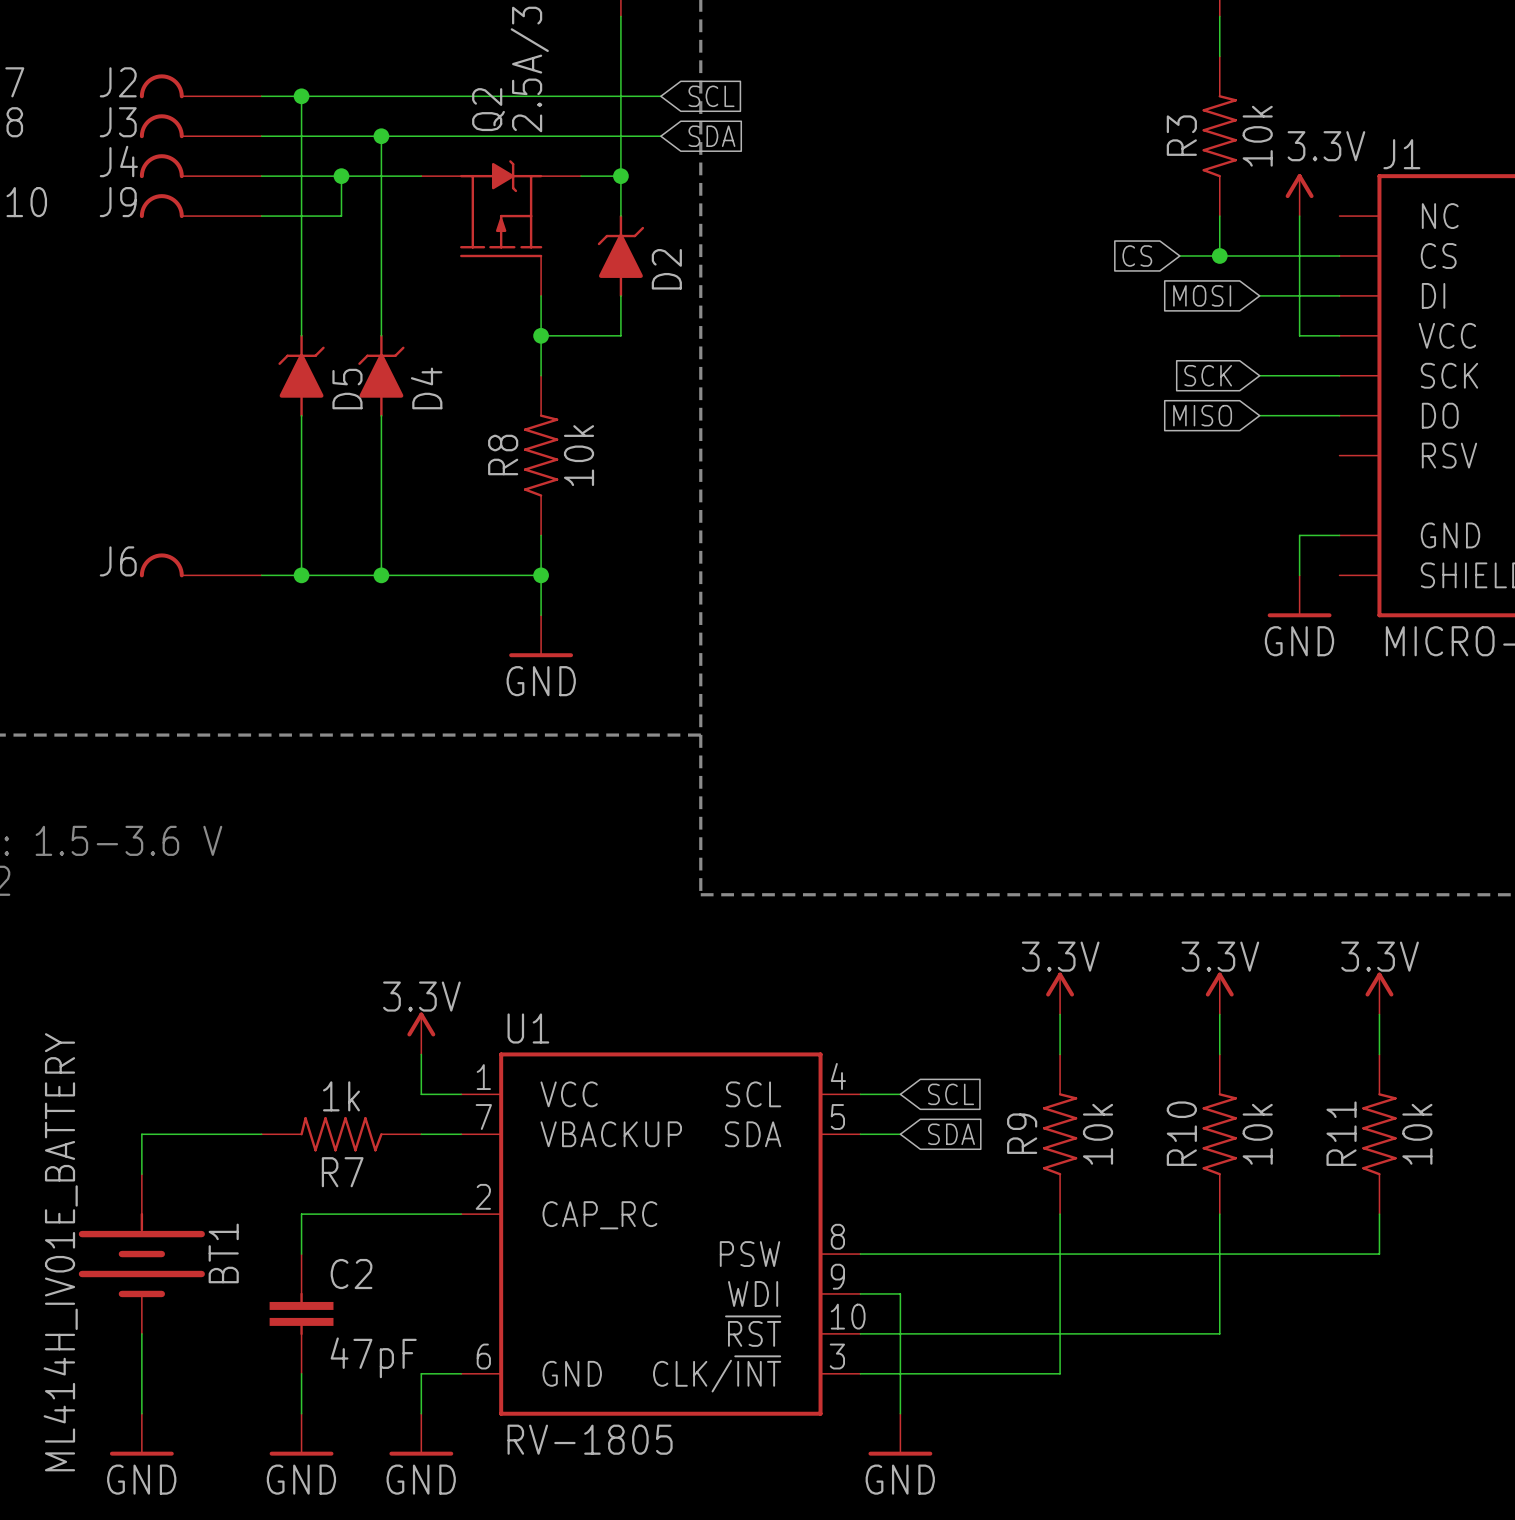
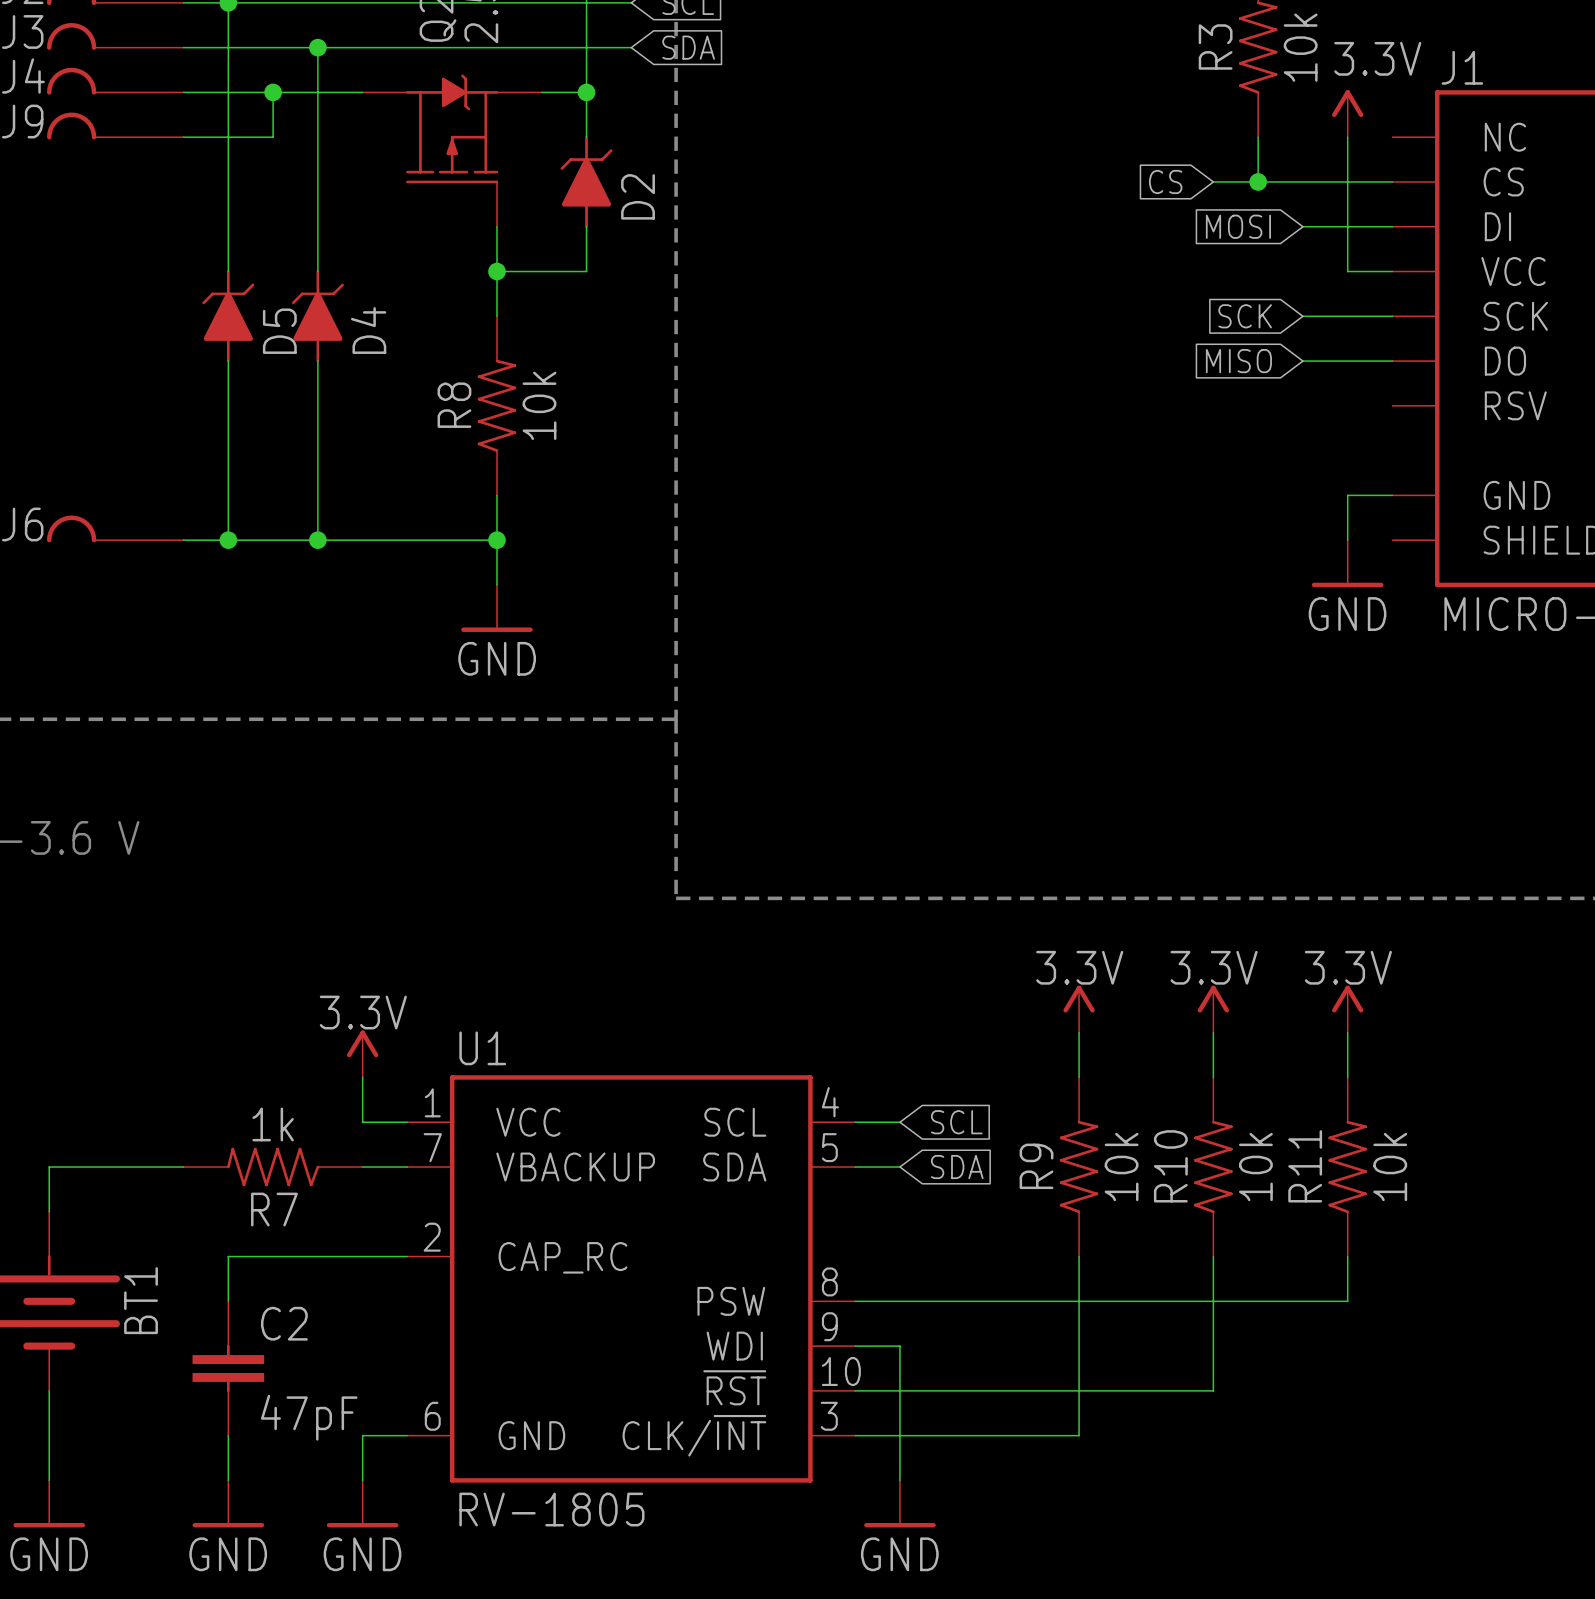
power symbol: none -> 3.3V (1213, 1009)
power symbol: 3.3V (1219, 993) -> none
power symbol: none -> 3.3V (1347, 1009)
power symbol: 3.3V (1379, 993) -> none
wire: (1219, 1014) (1219, 1054) -> (1213, 1032) (1213, 1077)
wire: (1379, 1014) (1379, 1054) -> (1347, 1032) (1347, 1077)
R10 position: (1219, 1134) -> (1213, 1167)
R11 position: (1379, 1134) -> (1347, 1167)
wire: (1219, 1214) (1219, 1333) (1179, 1333) -> (1213, 1256) (1213, 1390)
wire: (1379, 1214) (1379, 1254) (1299, 1254) -> (1347, 1256) (1347, 1301)

